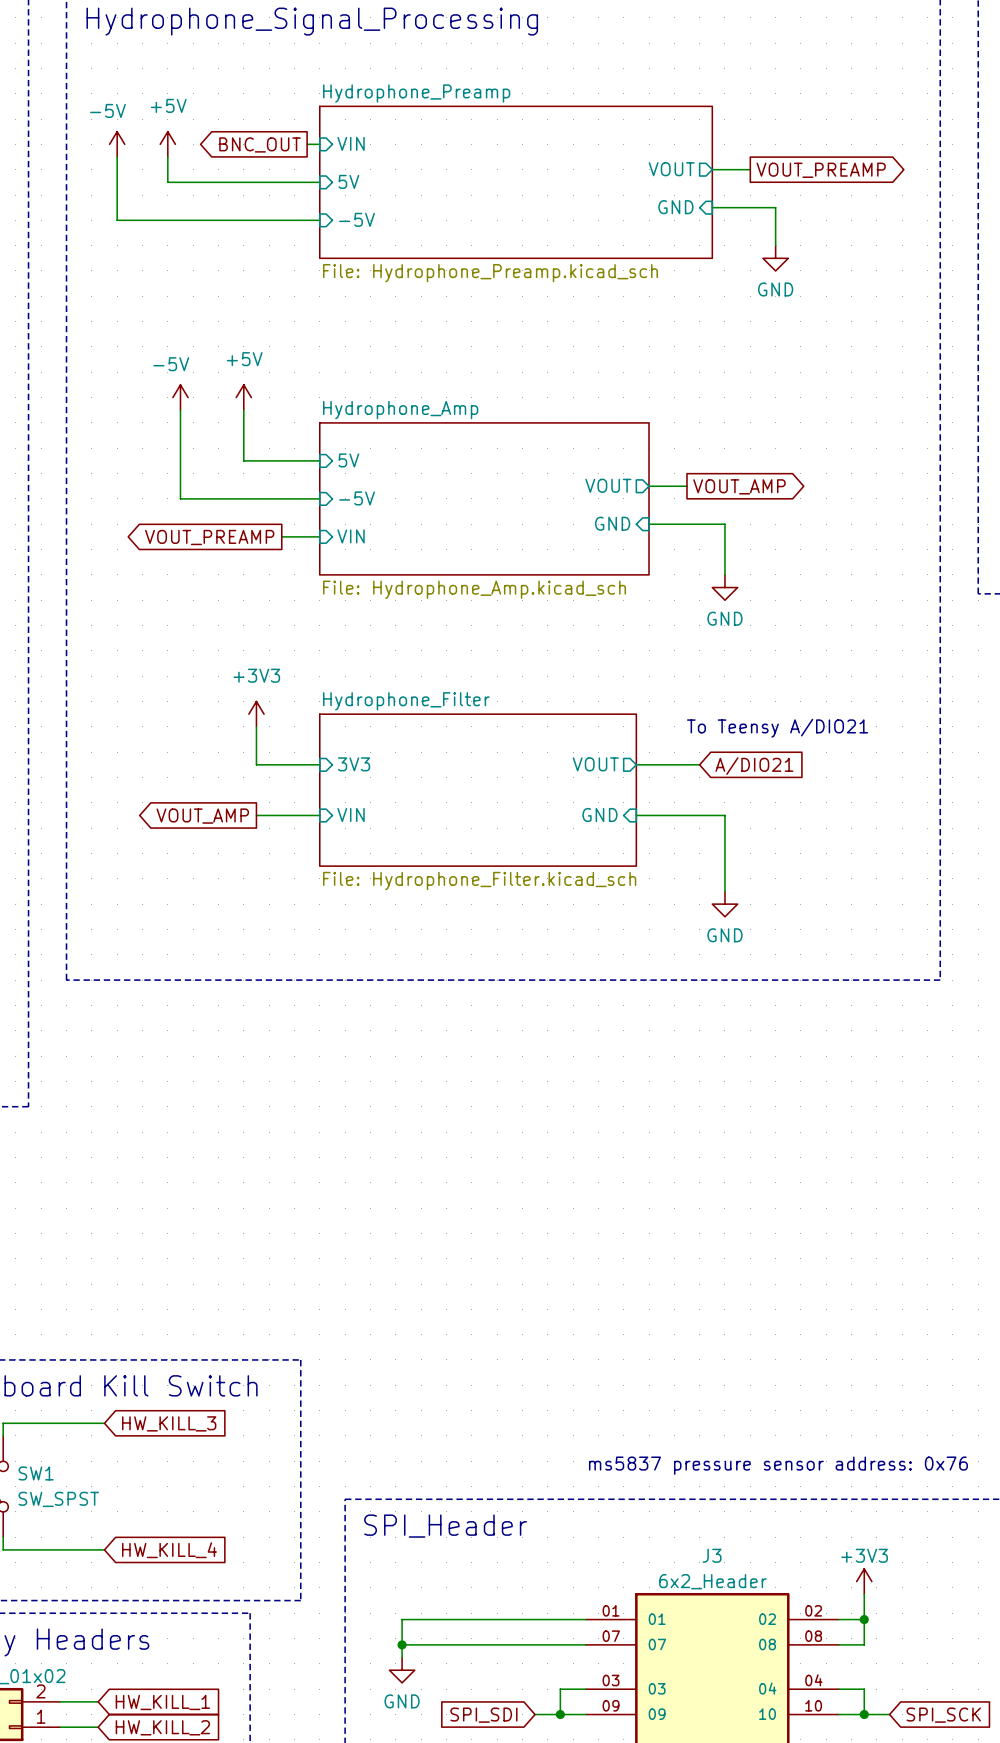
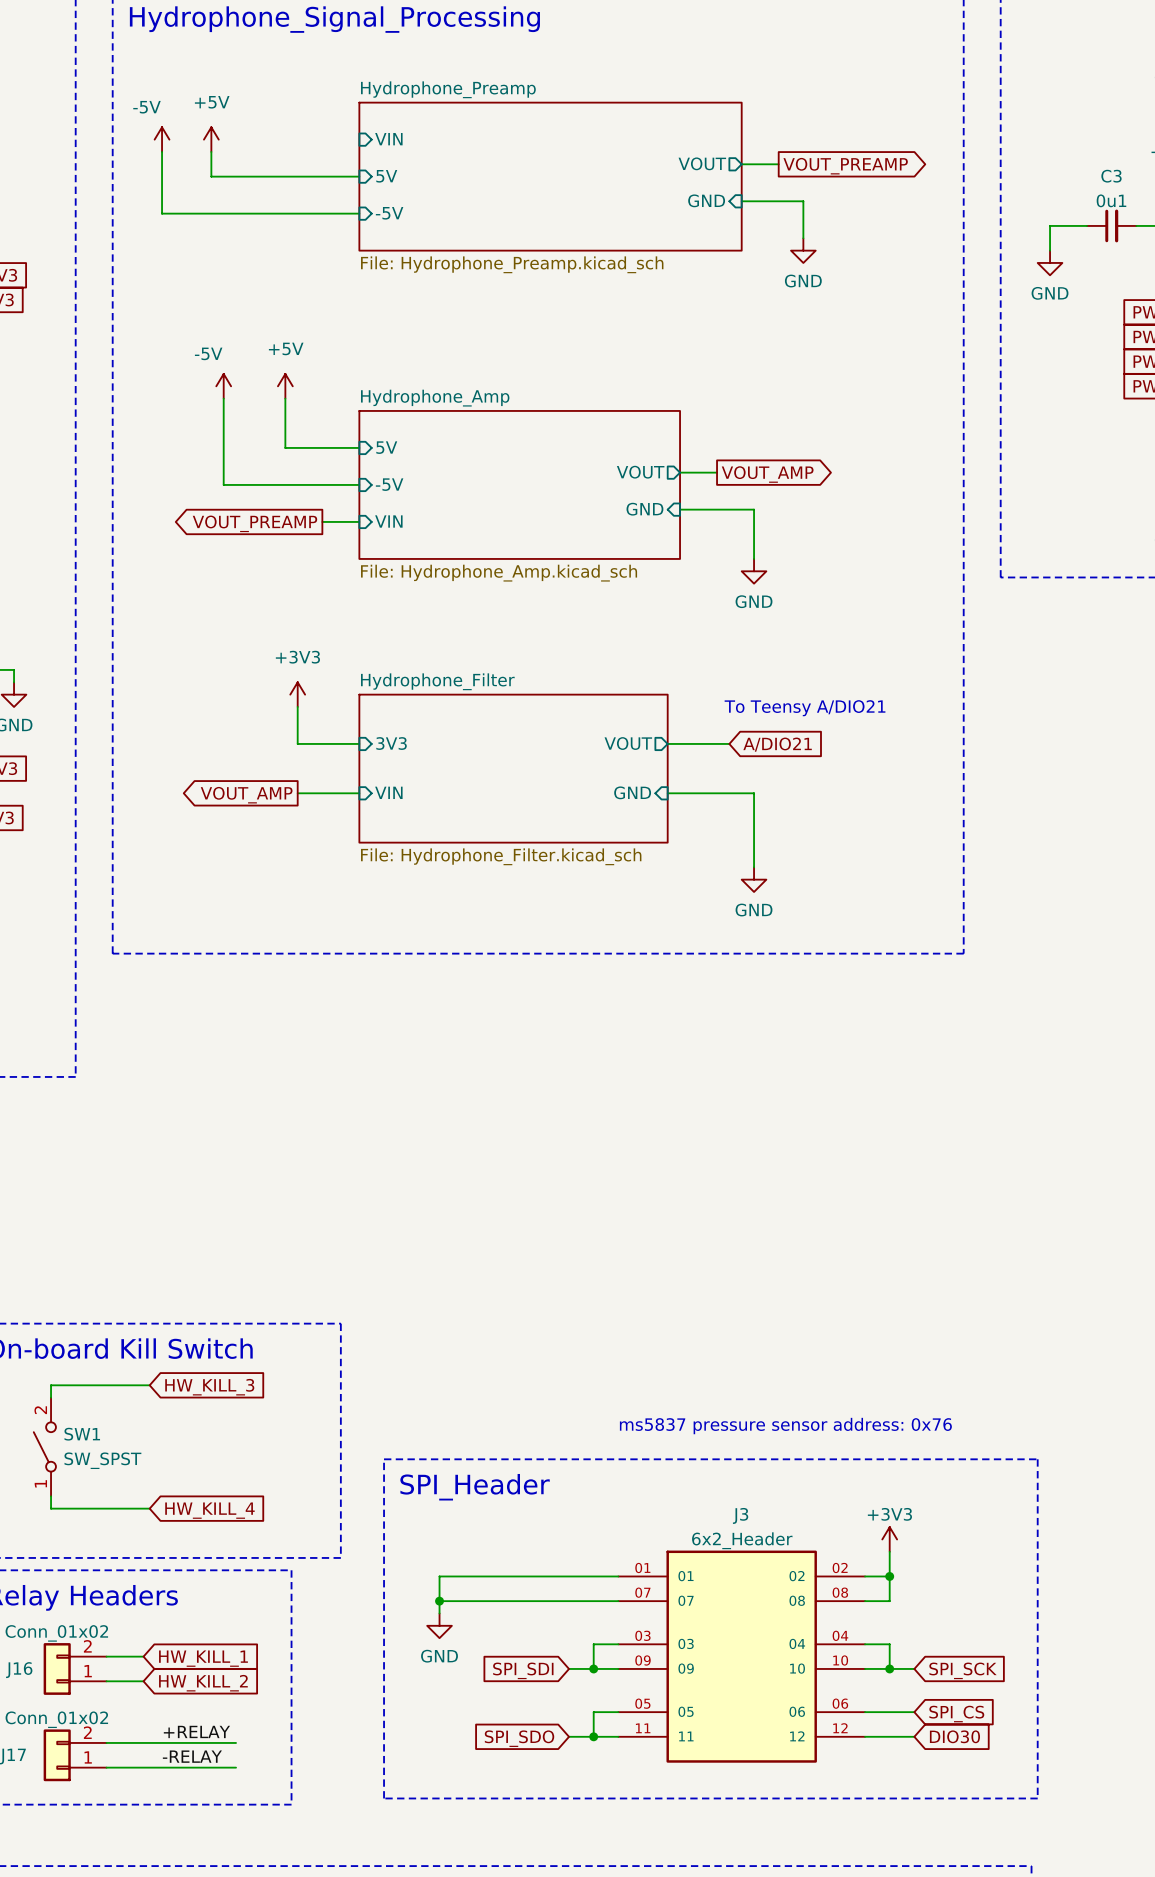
global label: BNC_OUT (260, 144) -> none
wire: (307, 144) (319, 144) -> none

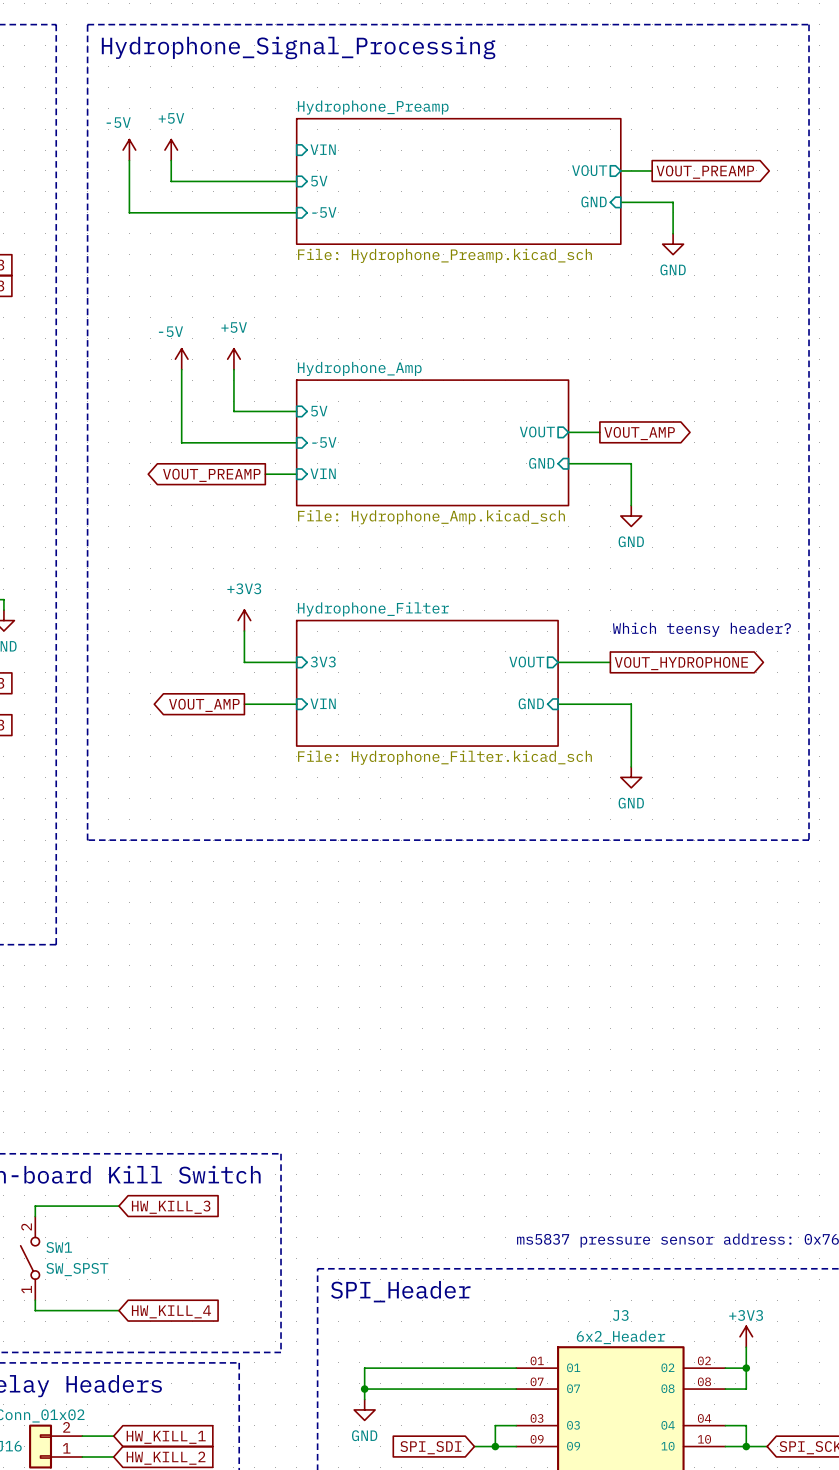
text: none -> Which teensy header? (701, 629)
text: To Teensy A/DIO21 (805, 708) -> none
global label shape: input (777, 744) -> output (681, 663)
global label: A/DIO21 (777, 744) -> VOUT_HYDROPHONE (681, 663)

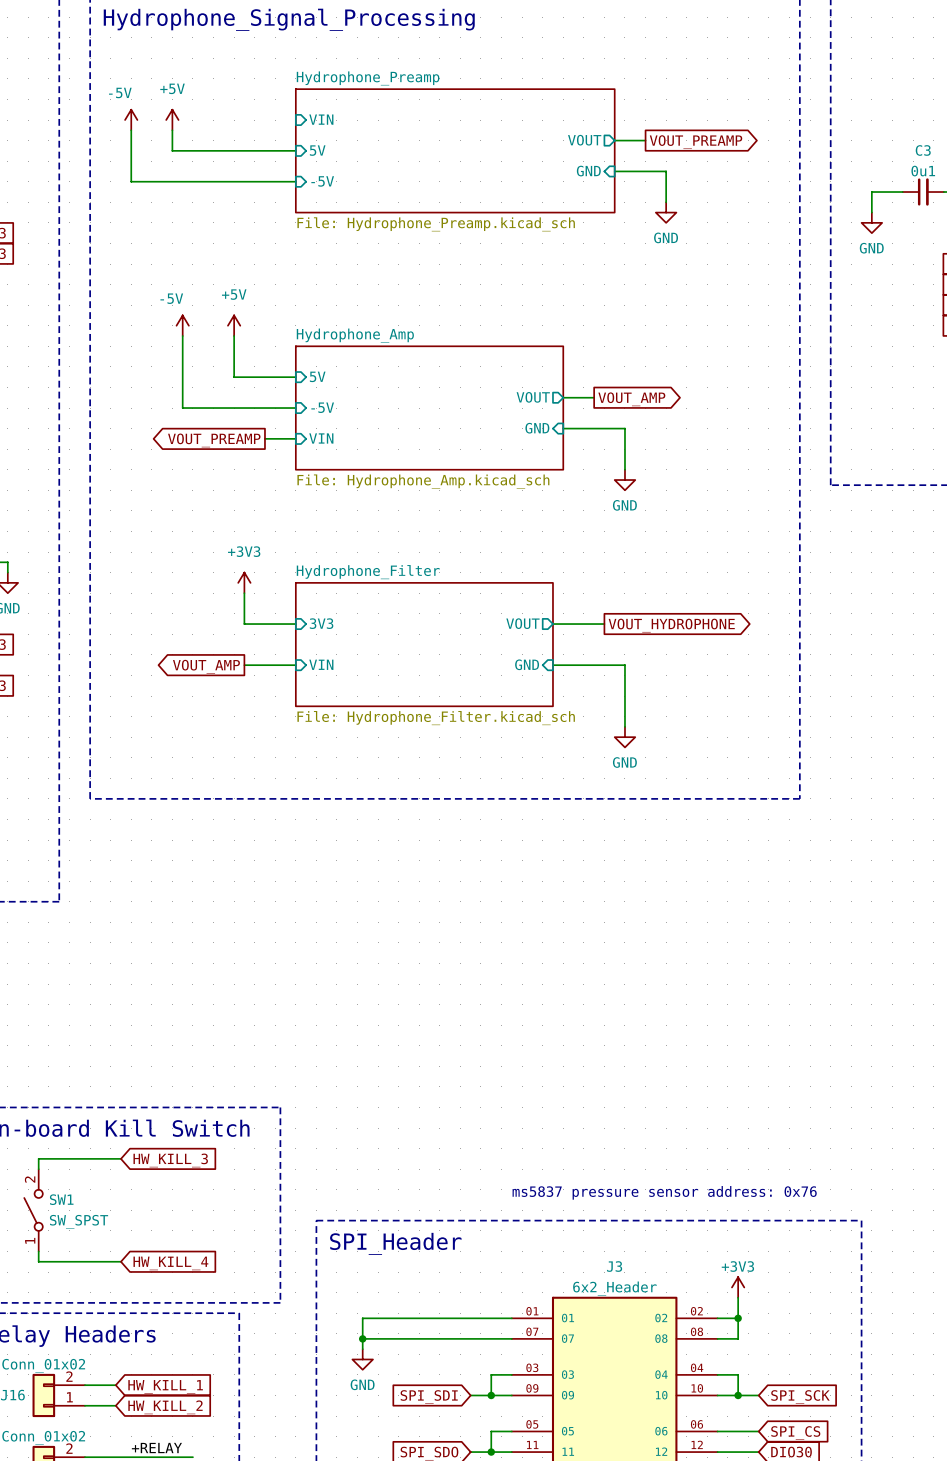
text: Which teensy header? (701, 629) -> none

